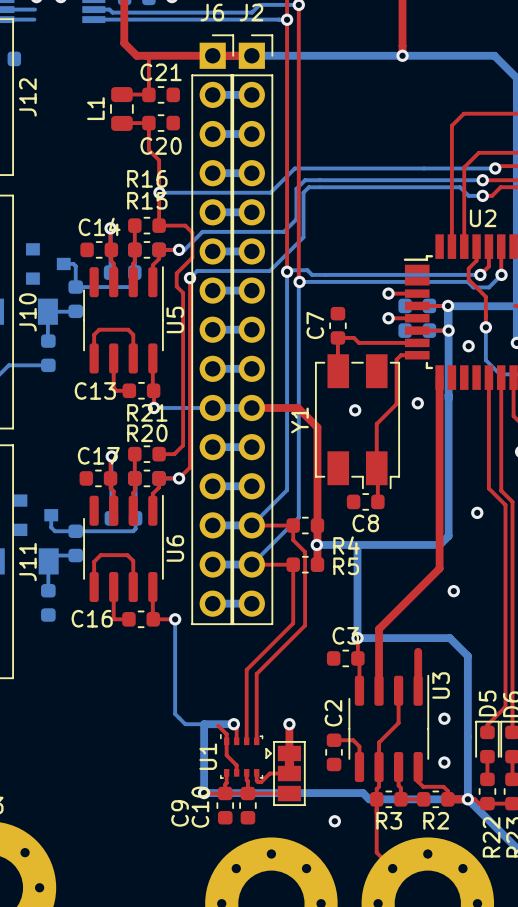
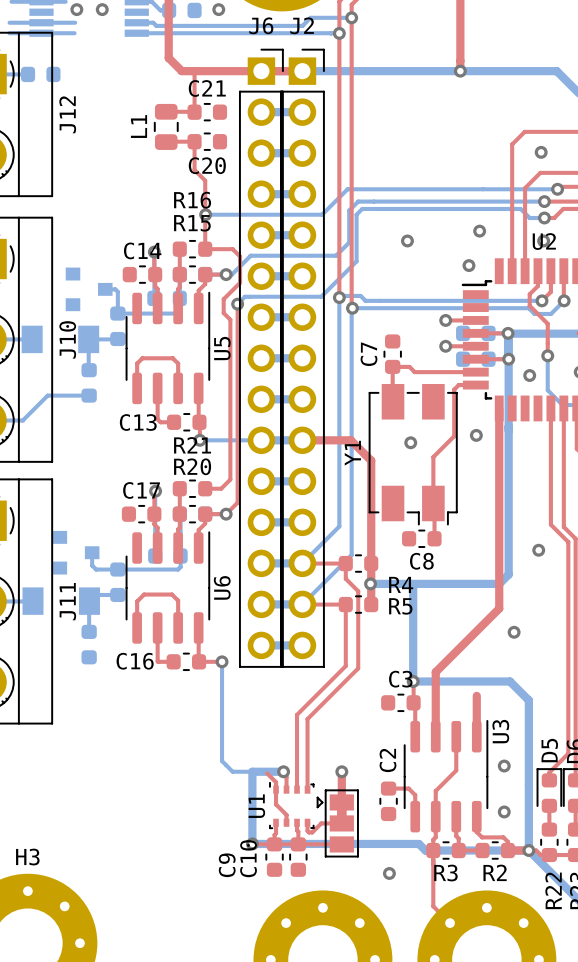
via: none -> (541, 152)
via: none -> (479, 231)
via: none -> (407, 240)
via: none -> (543, 240)
via: none -> (468, 265)

